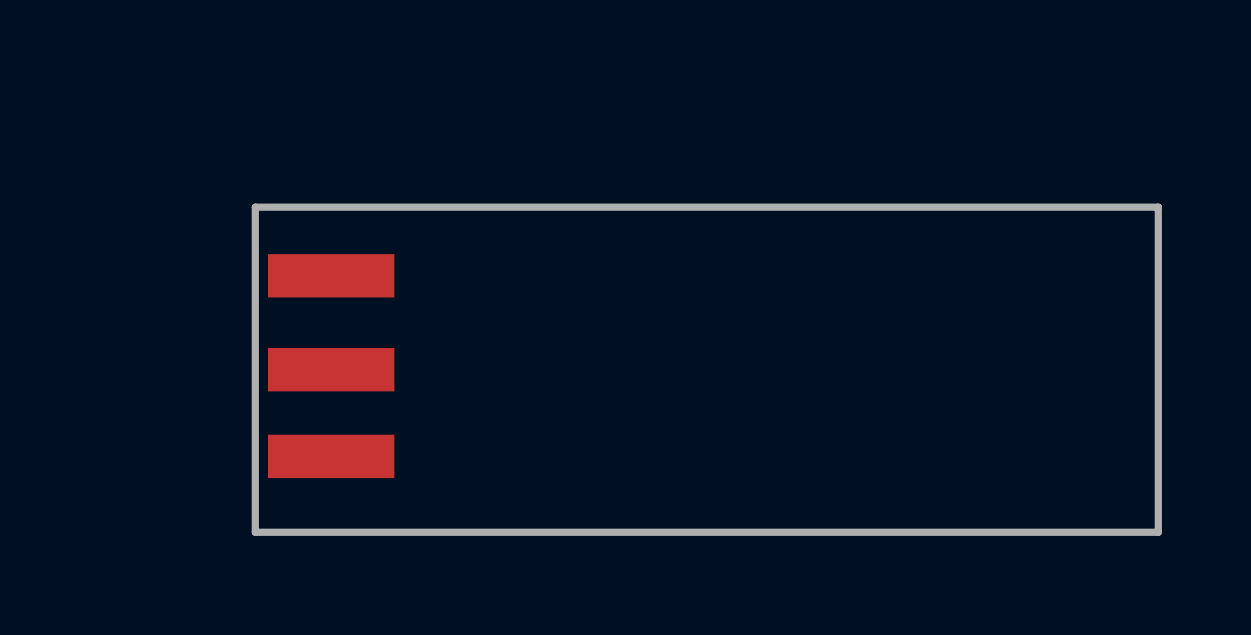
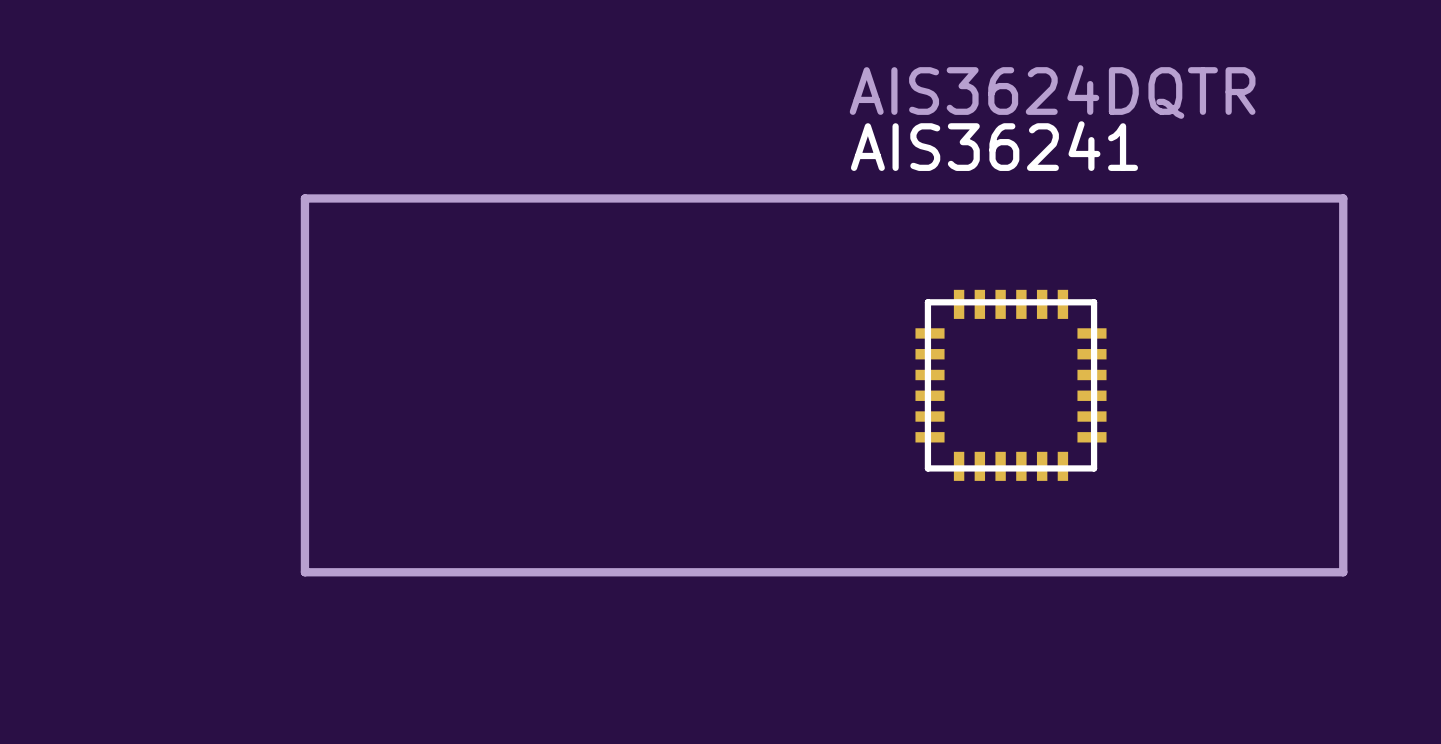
part: (331, 275) -> none
part: (331, 369) -> none
AIS36241: none -> AIS3624DQTR (1010, 385)
part: (331, 456) -> none

